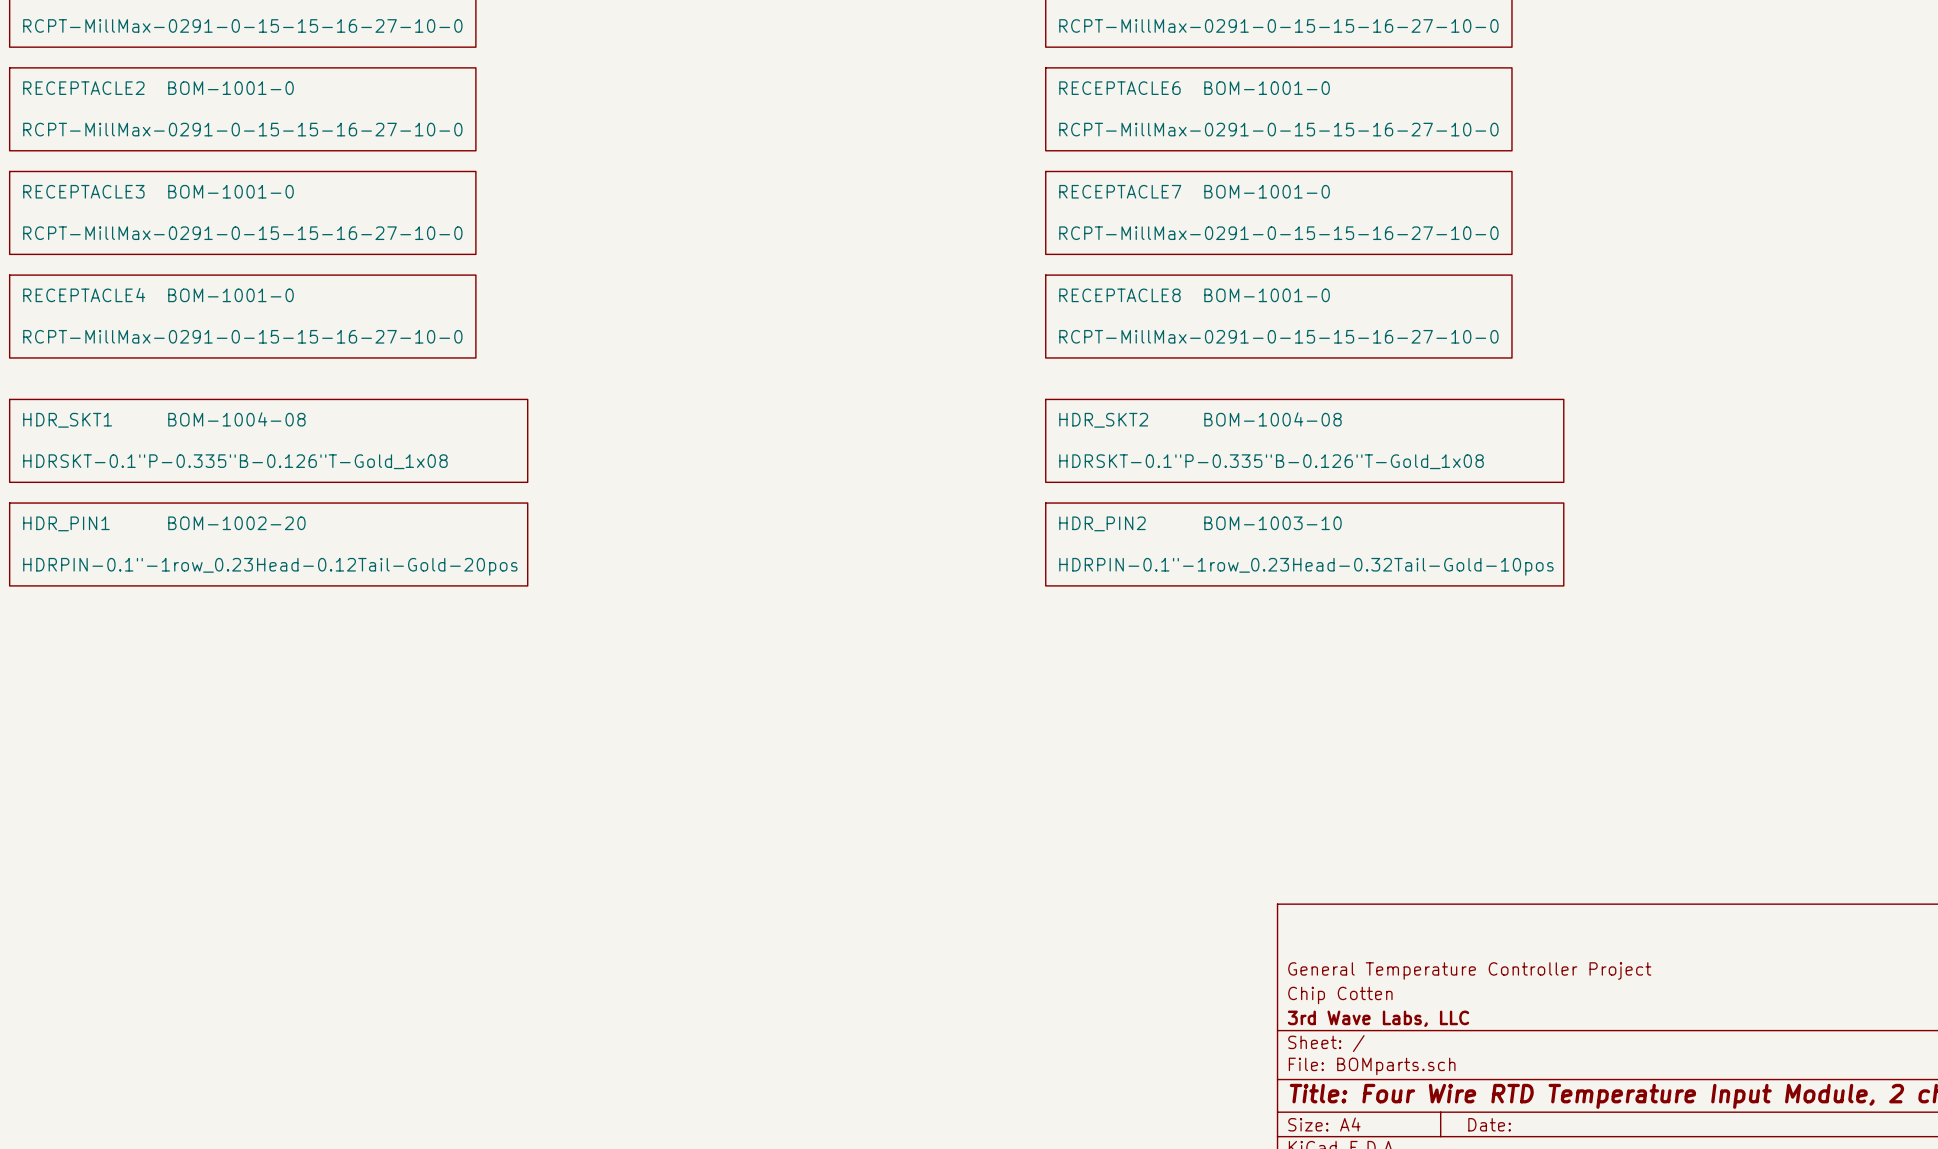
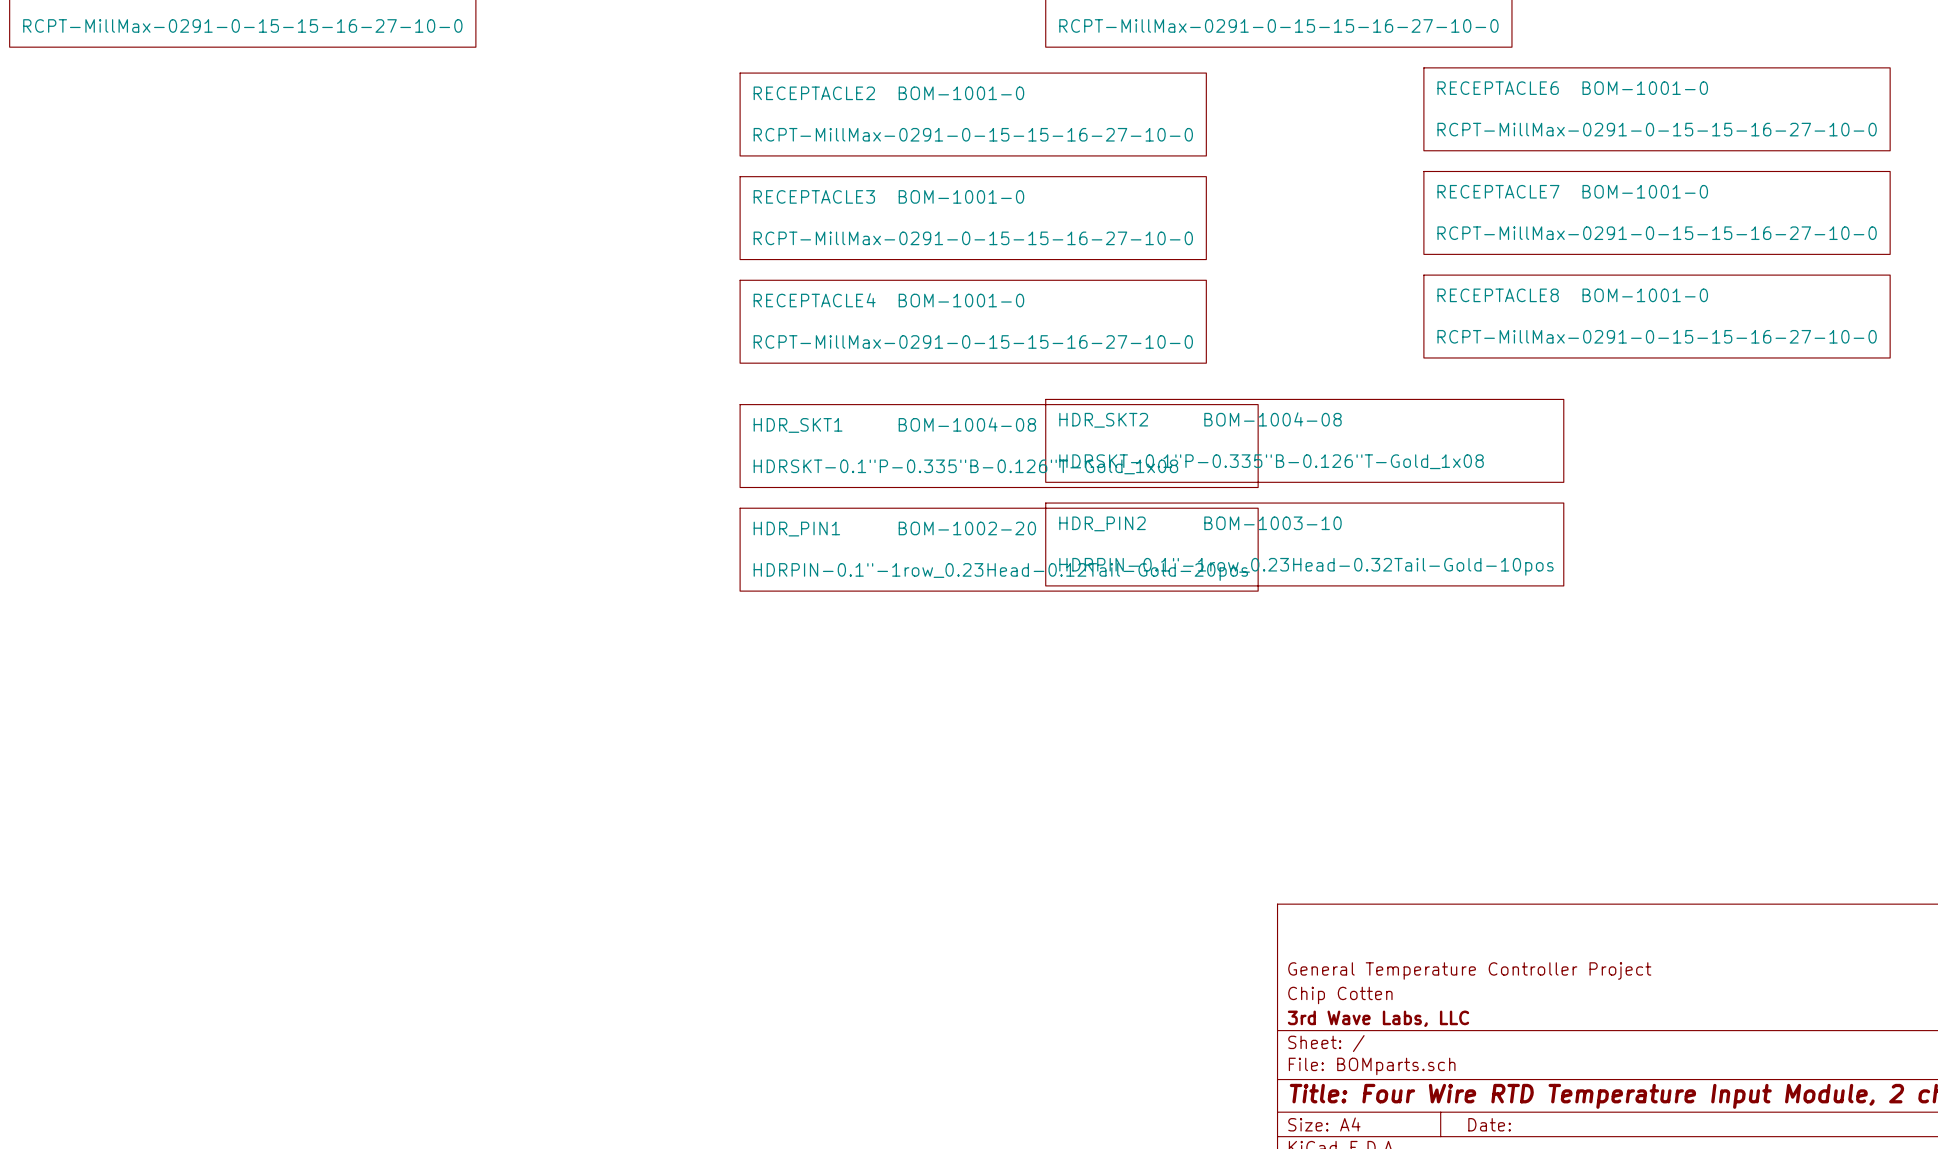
RECEPTACLE2 position: (242, 109) -> (973, 114)
RECEPTACLE6 position: (1278, 109) -> (1657, 109)
RECEPTACLE3 position: (242, 212) -> (973, 218)
RECEPTACLE7 position: (1278, 212) -> (1657, 212)
RECEPTACLE4 position: (242, 316) -> (973, 321)
RECEPTACLE8 position: (1278, 316) -> (1657, 316)
HDR_SKT1 position: (268, 440) -> (999, 446)
HDR_PIN1 position: (268, 544) -> (999, 549)

